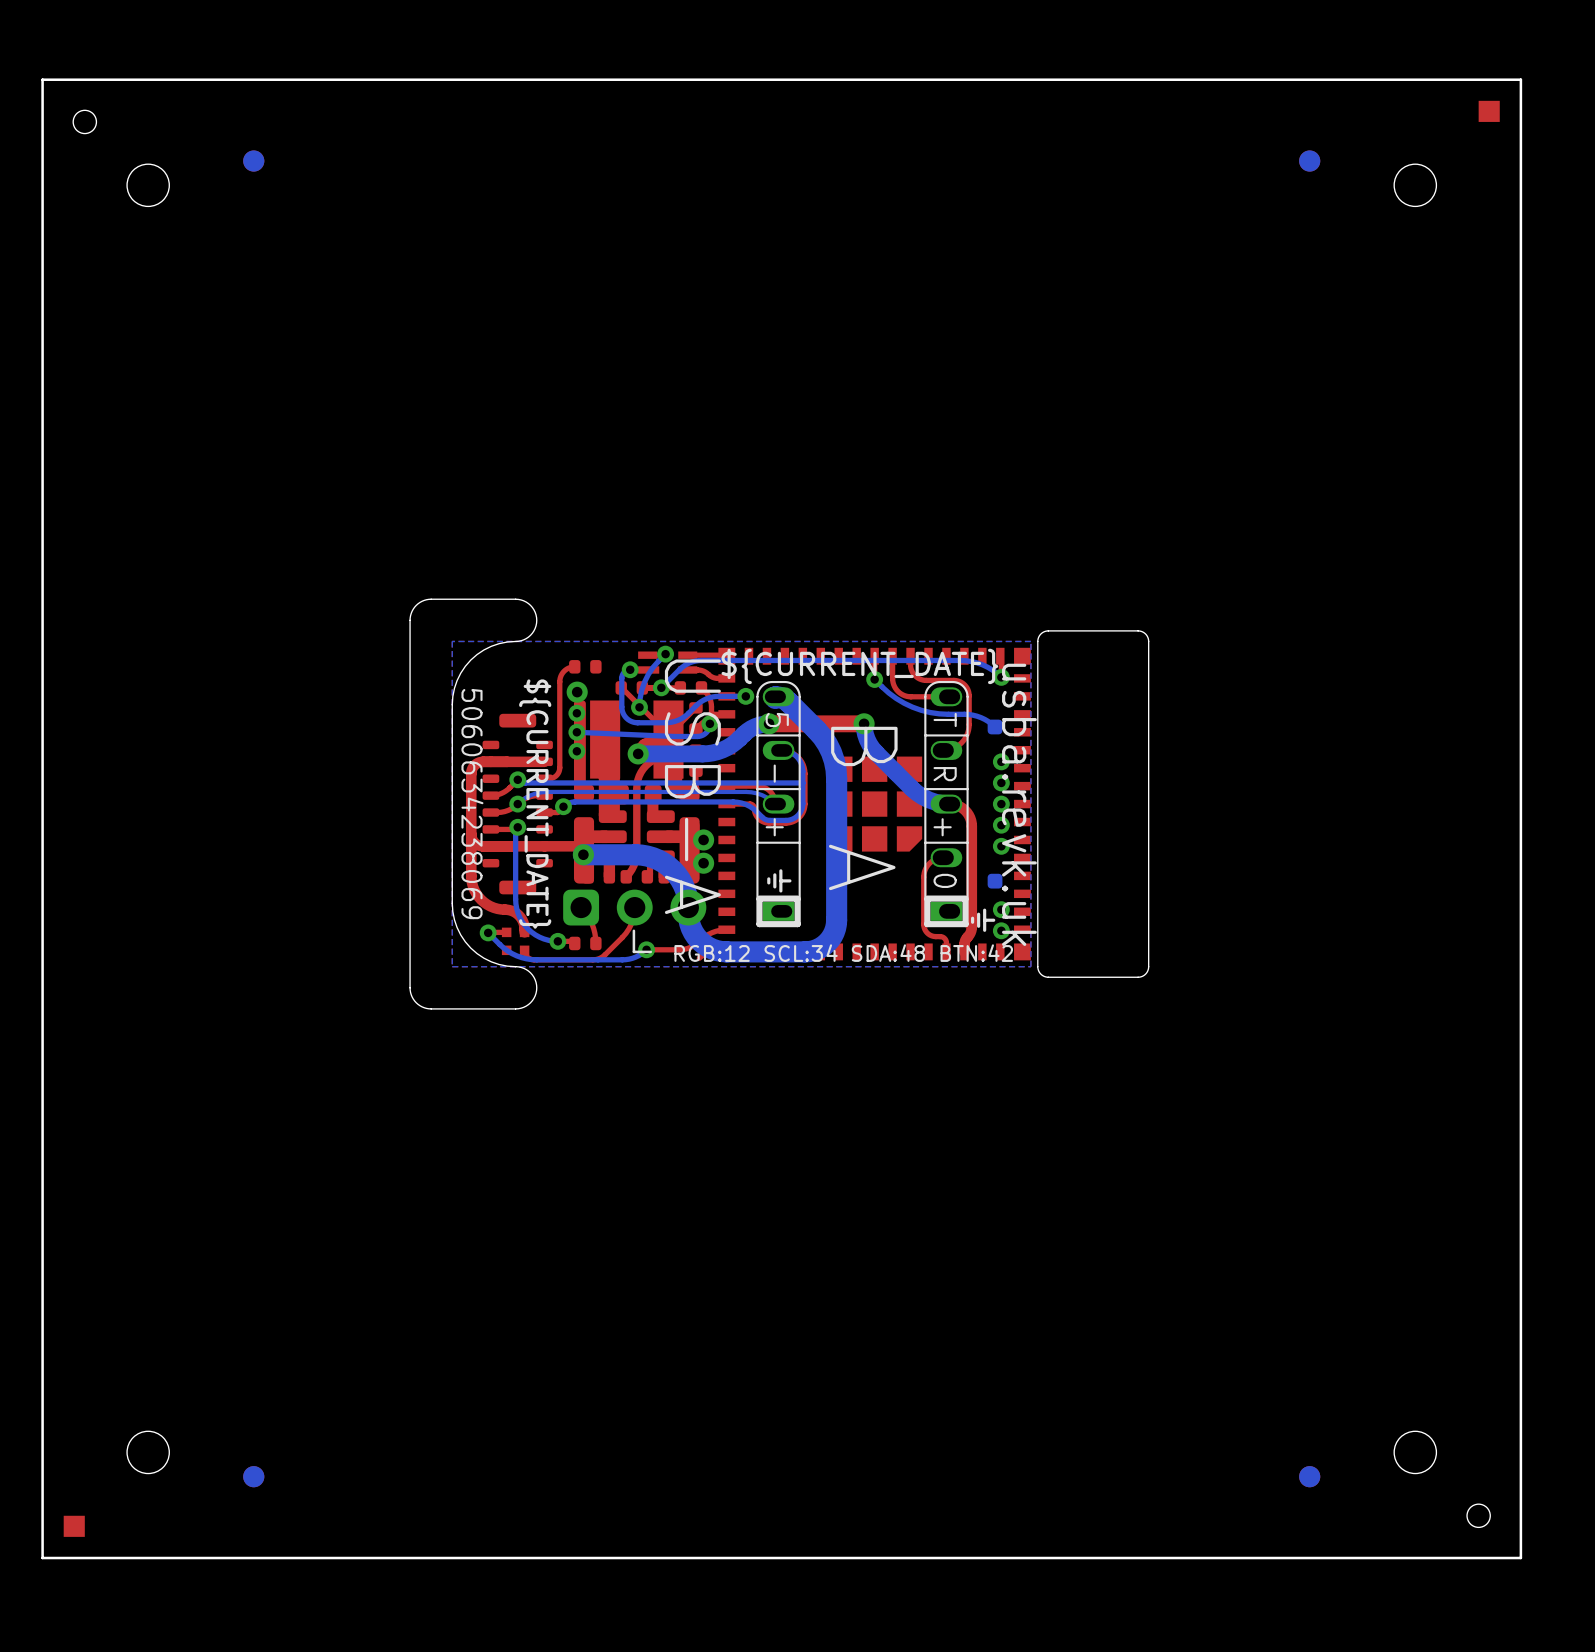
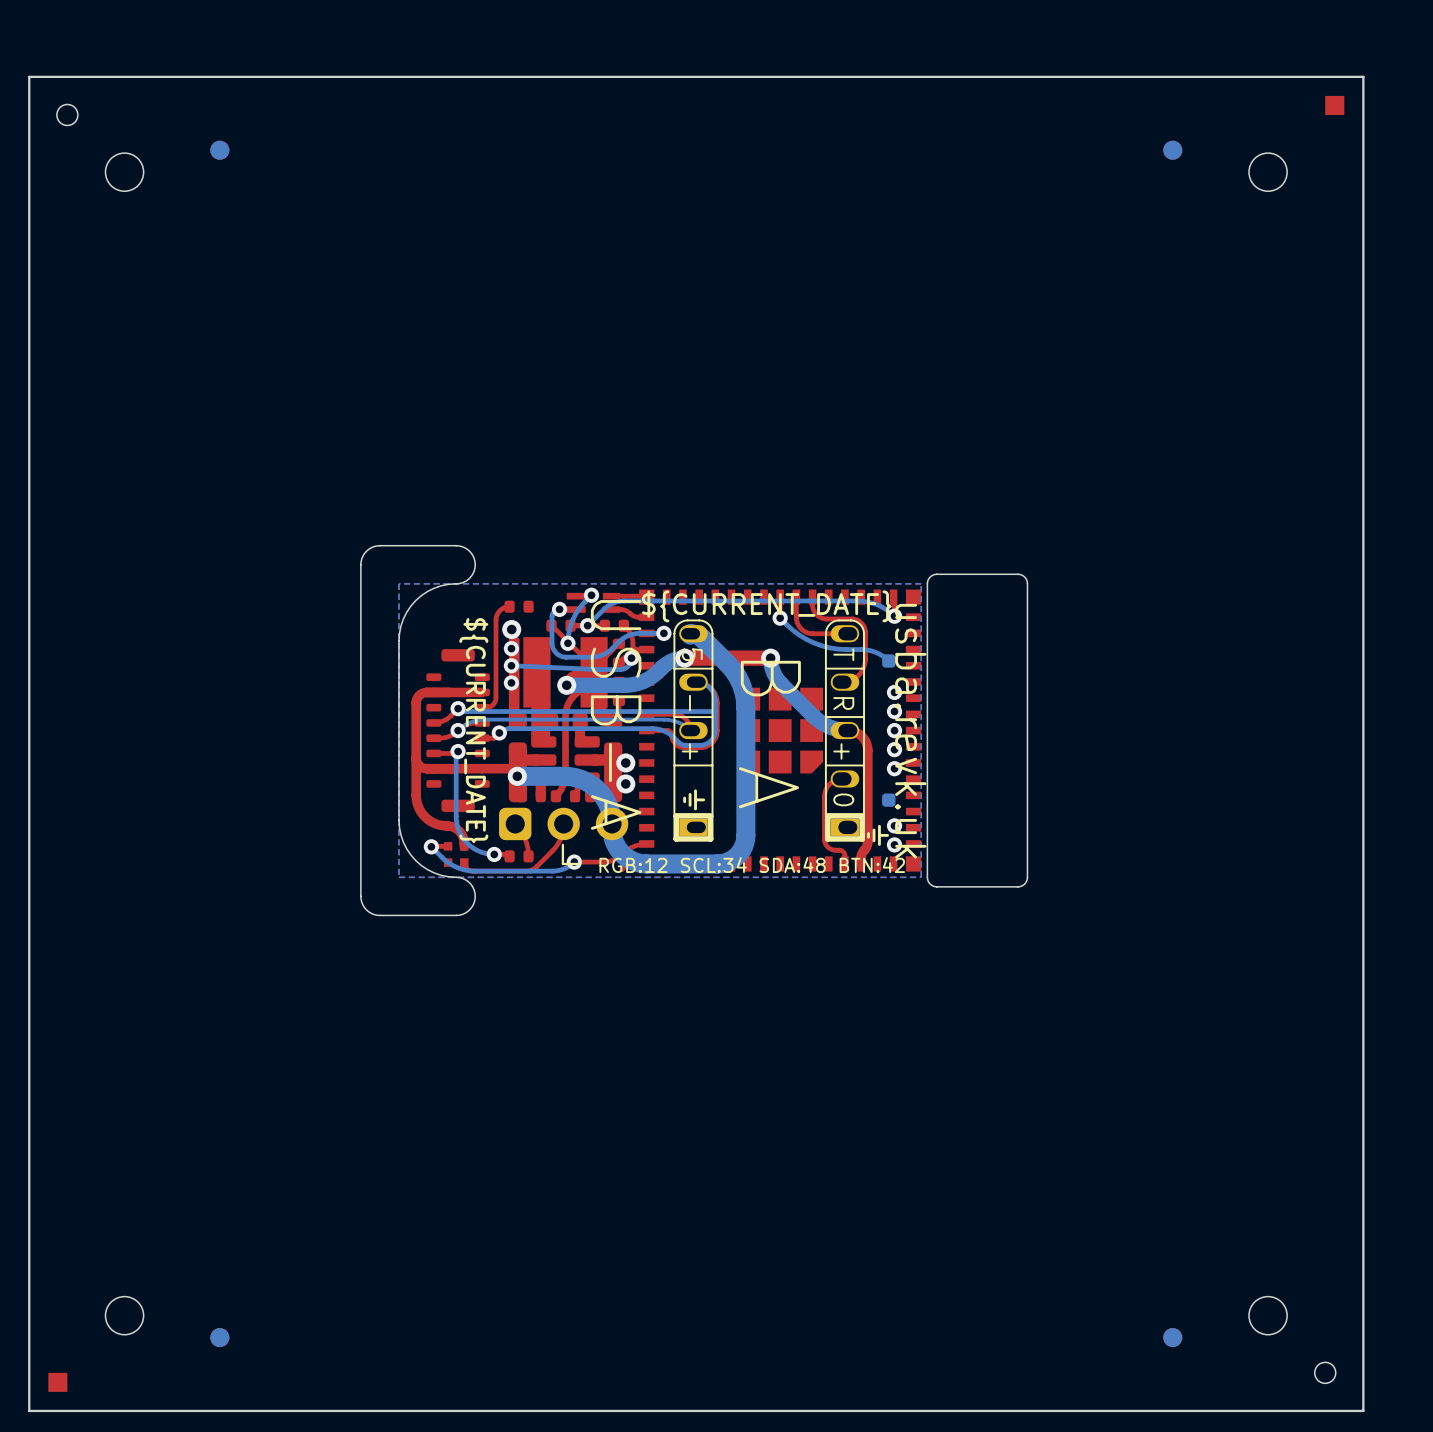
text: 5060634238069 (472, 804) -> none

